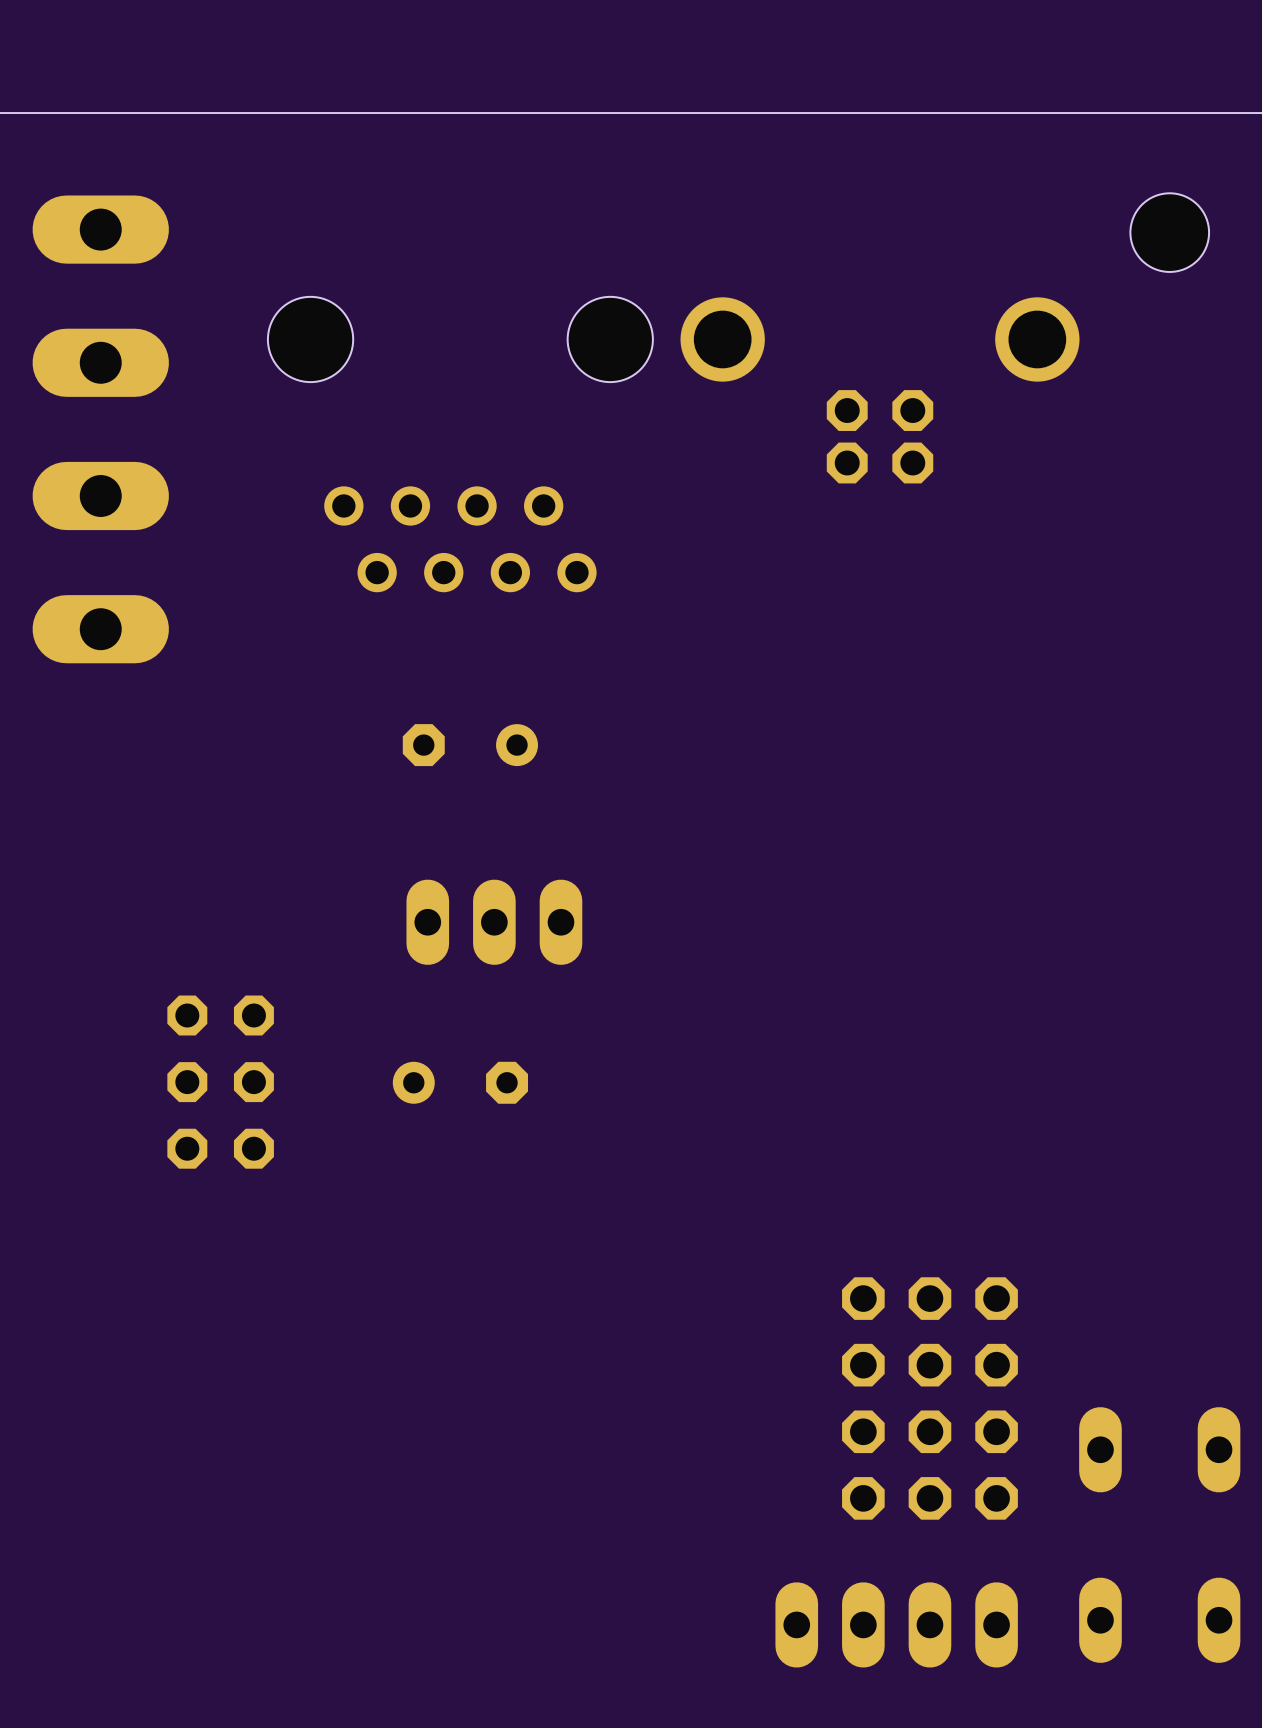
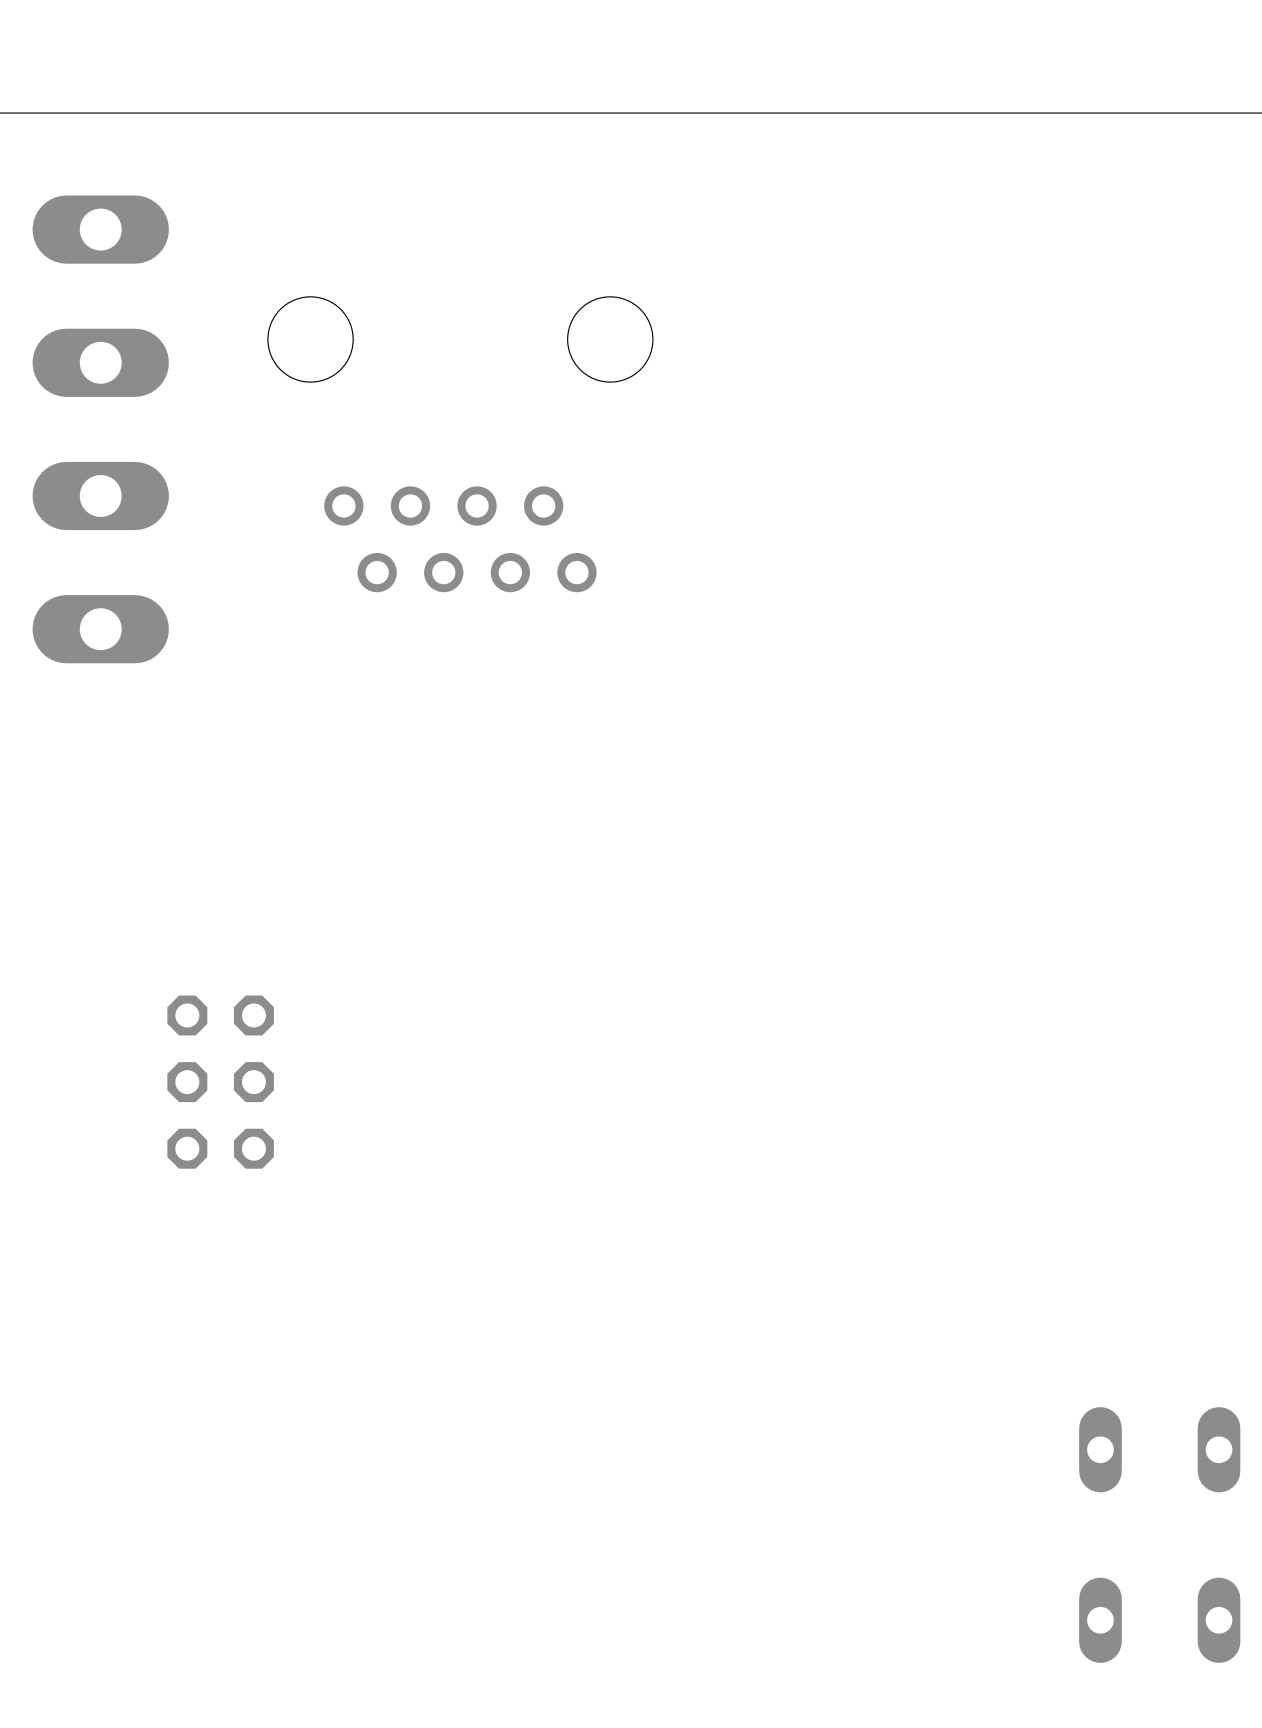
part: (1169, 232) -> none
part: (880, 390) -> none
part: (470, 745) -> none
part: (494, 922) -> none
part: (460, 1082) -> none
part: (929, 1331) -> none
part: (929, 1465) -> none
part: (896, 1624) -> none

